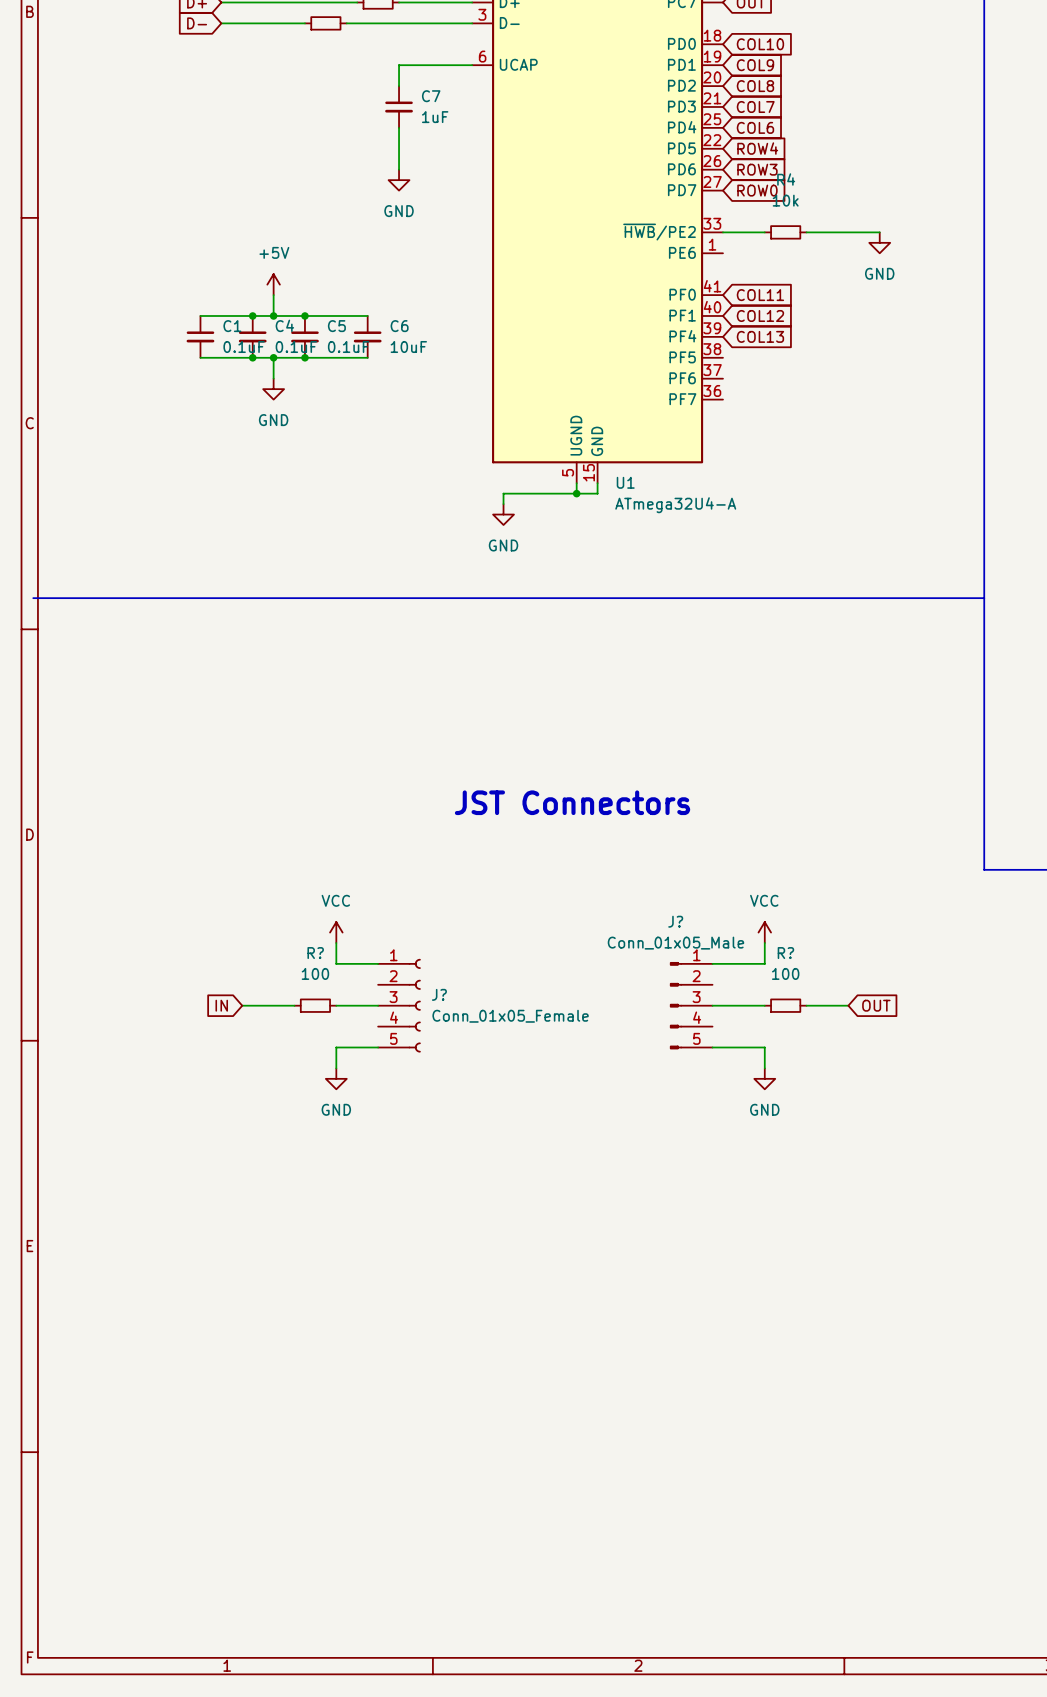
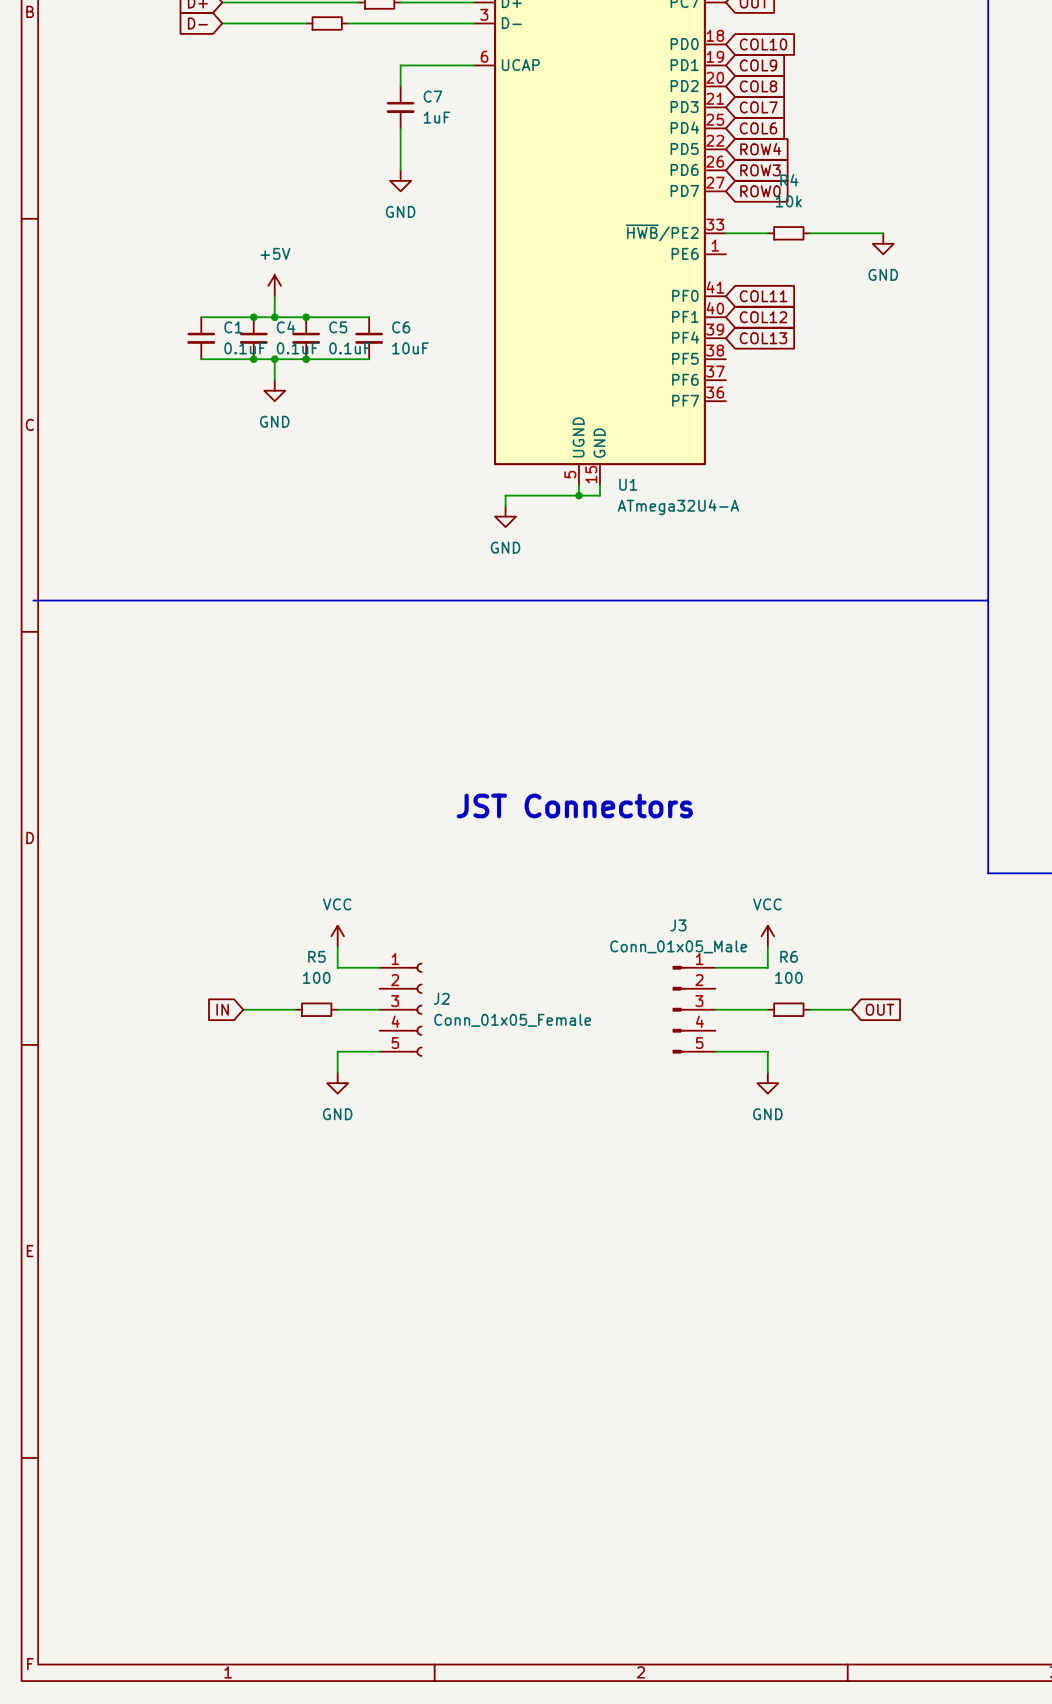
J? name: J? (675, 921) -> J3 (678, 925)
R? name: R? (315, 953) -> R5 (316, 956)
R? name: R? (785, 953) -> R6 (789, 956)
J? name: J? (439, 994) -> J2 (441, 998)

